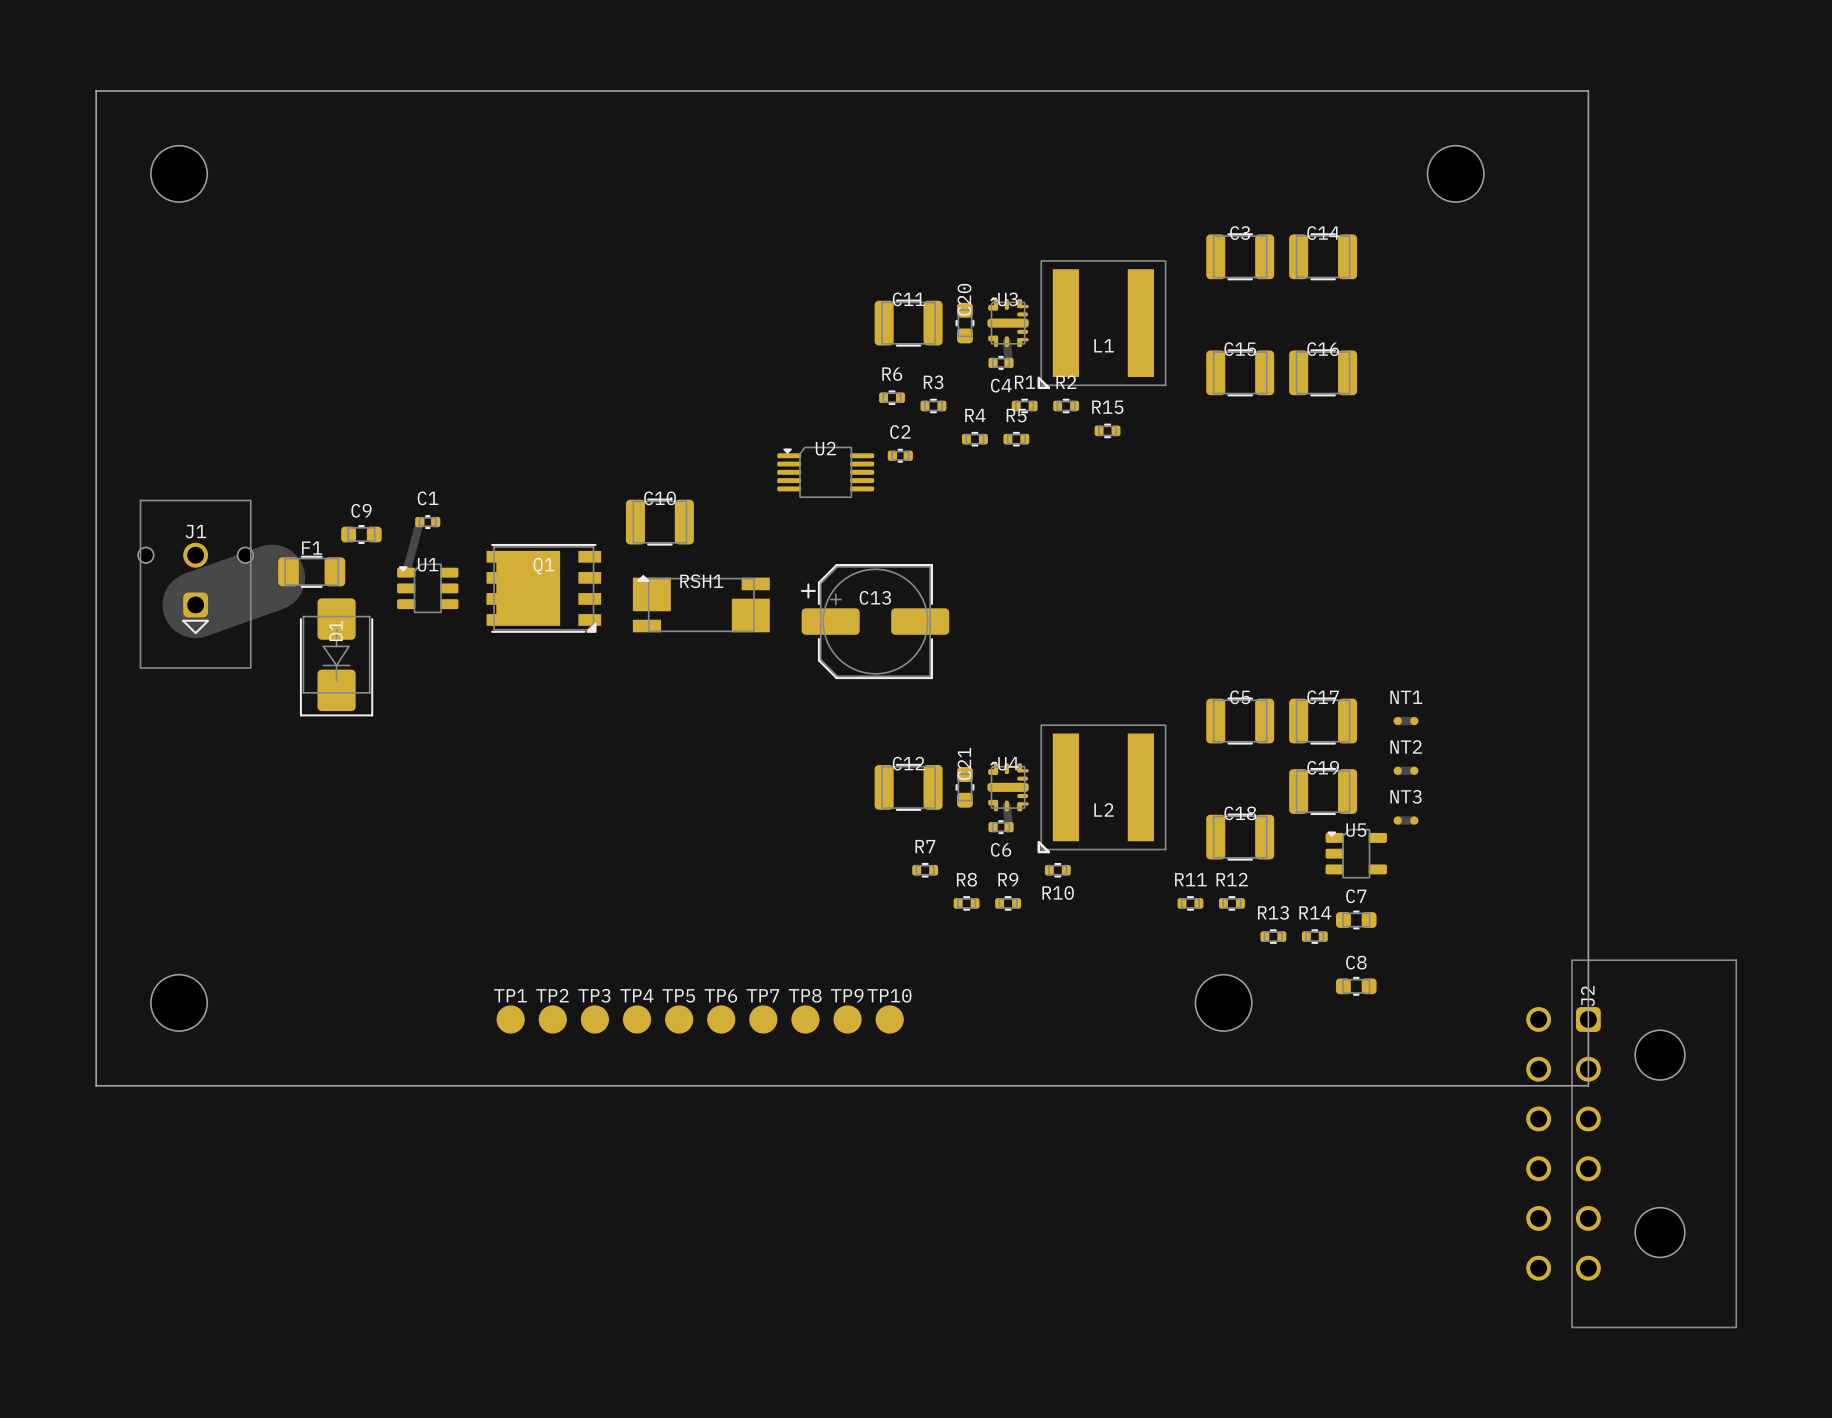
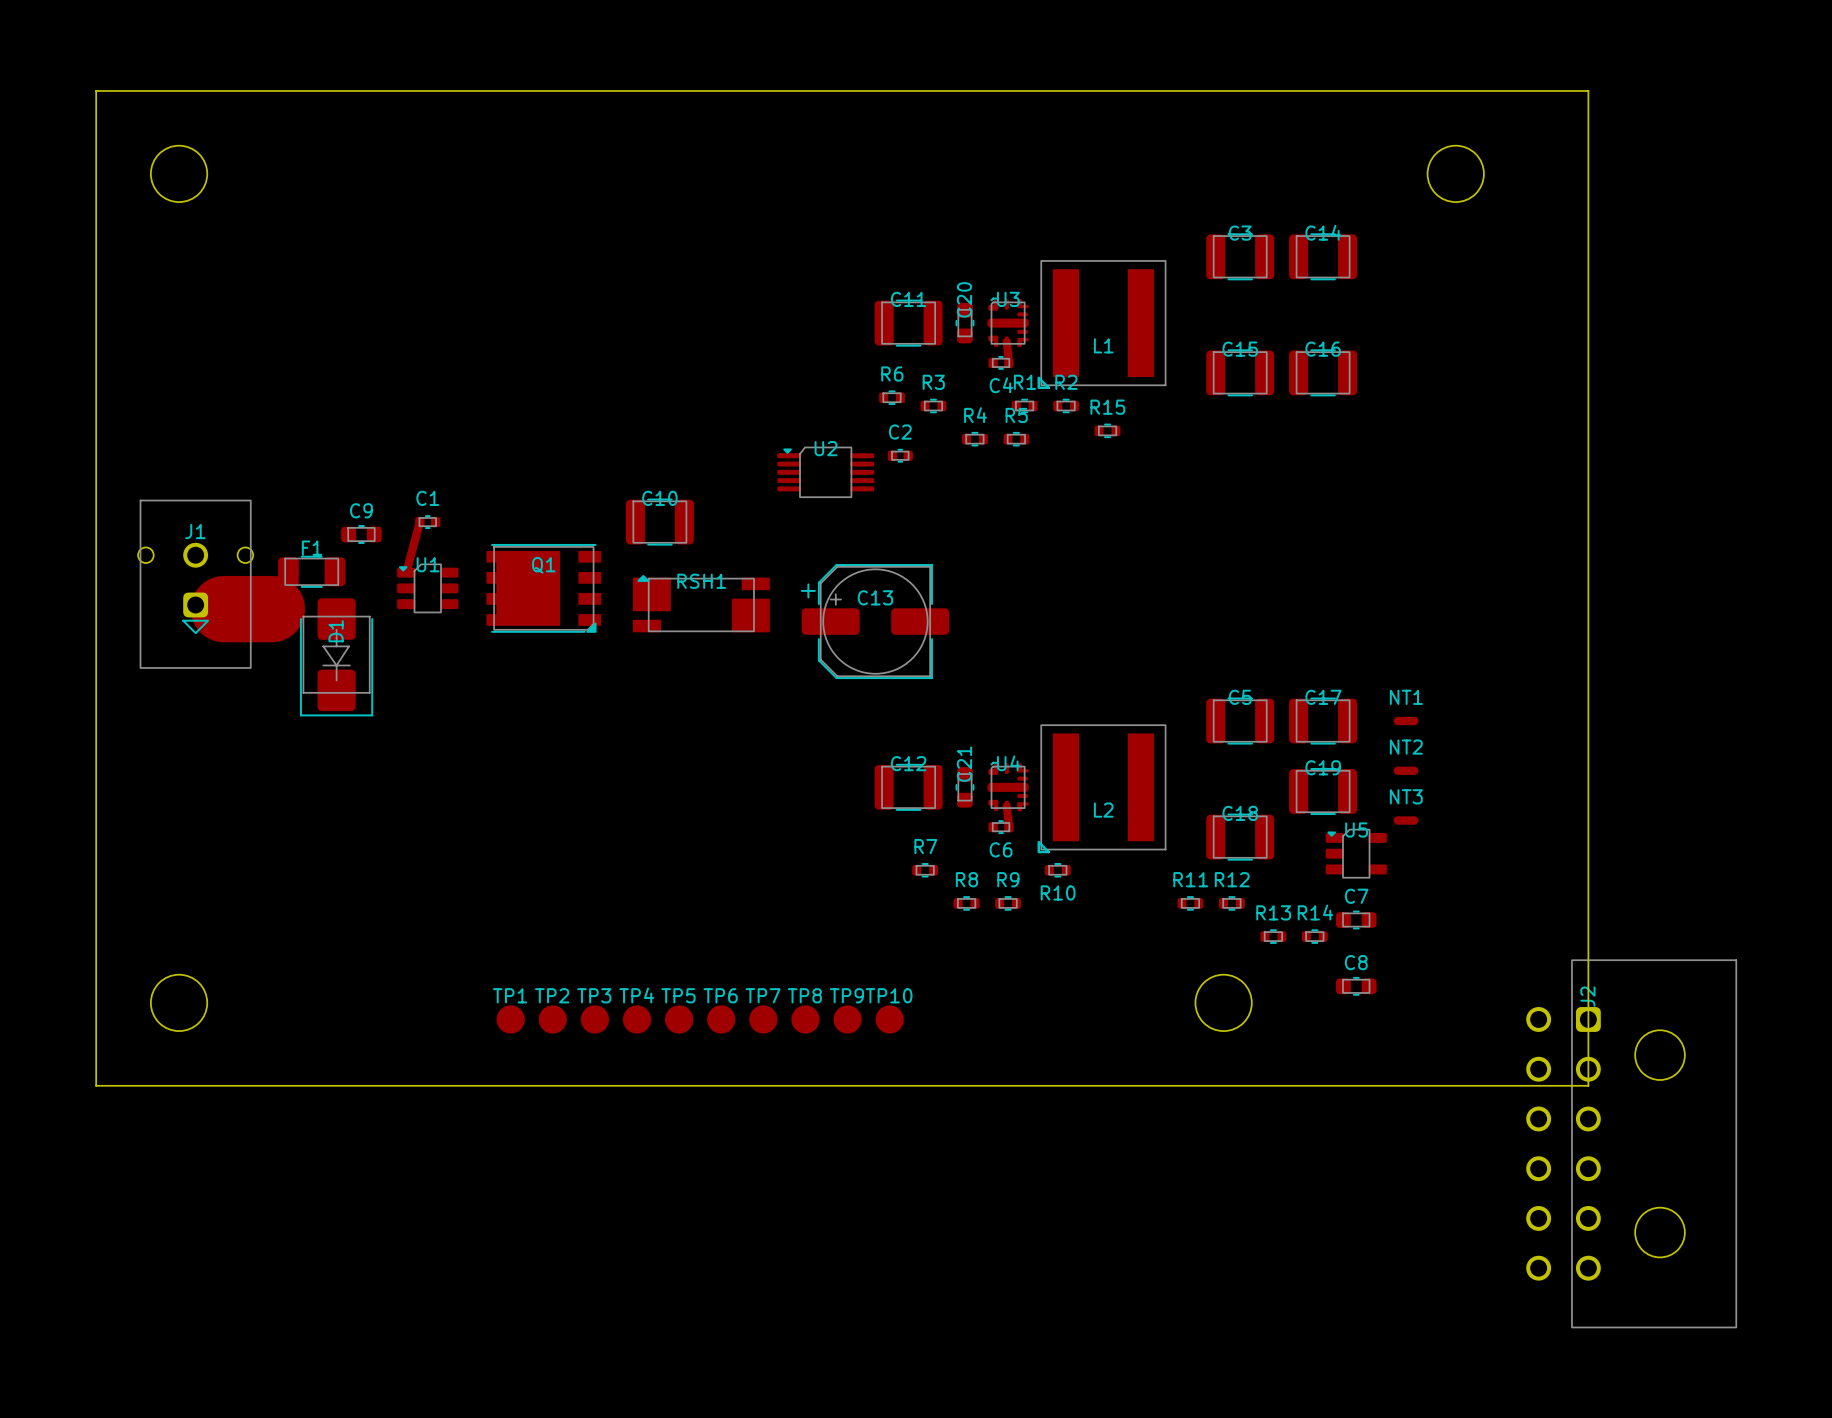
track: (271, 577) (195, 604) -> none
track: none -> (223, 609) (271, 609)

